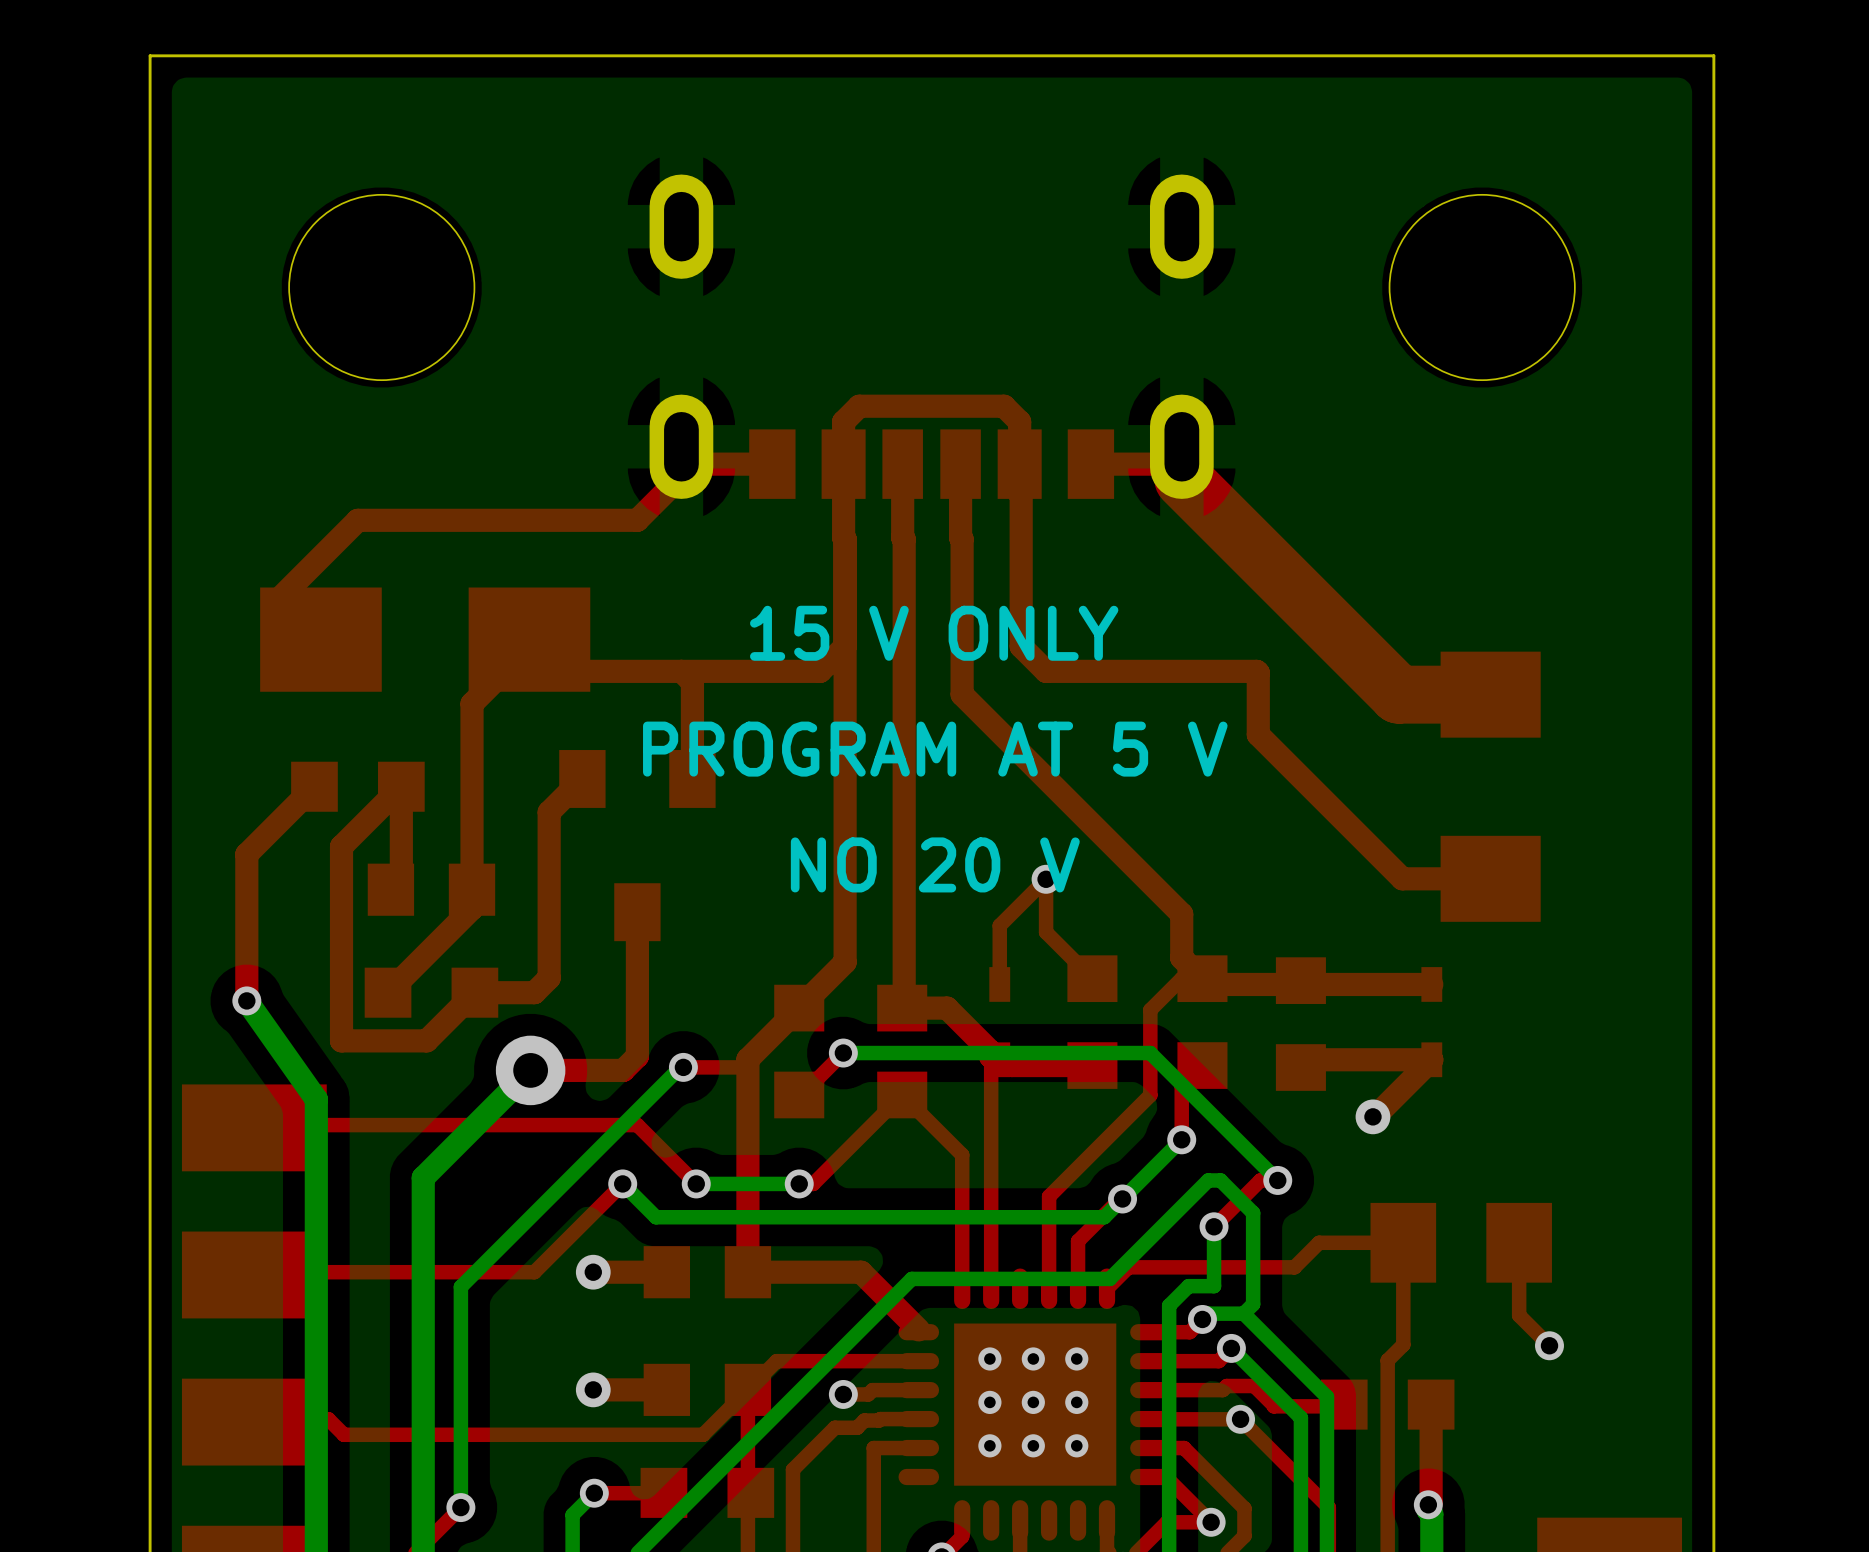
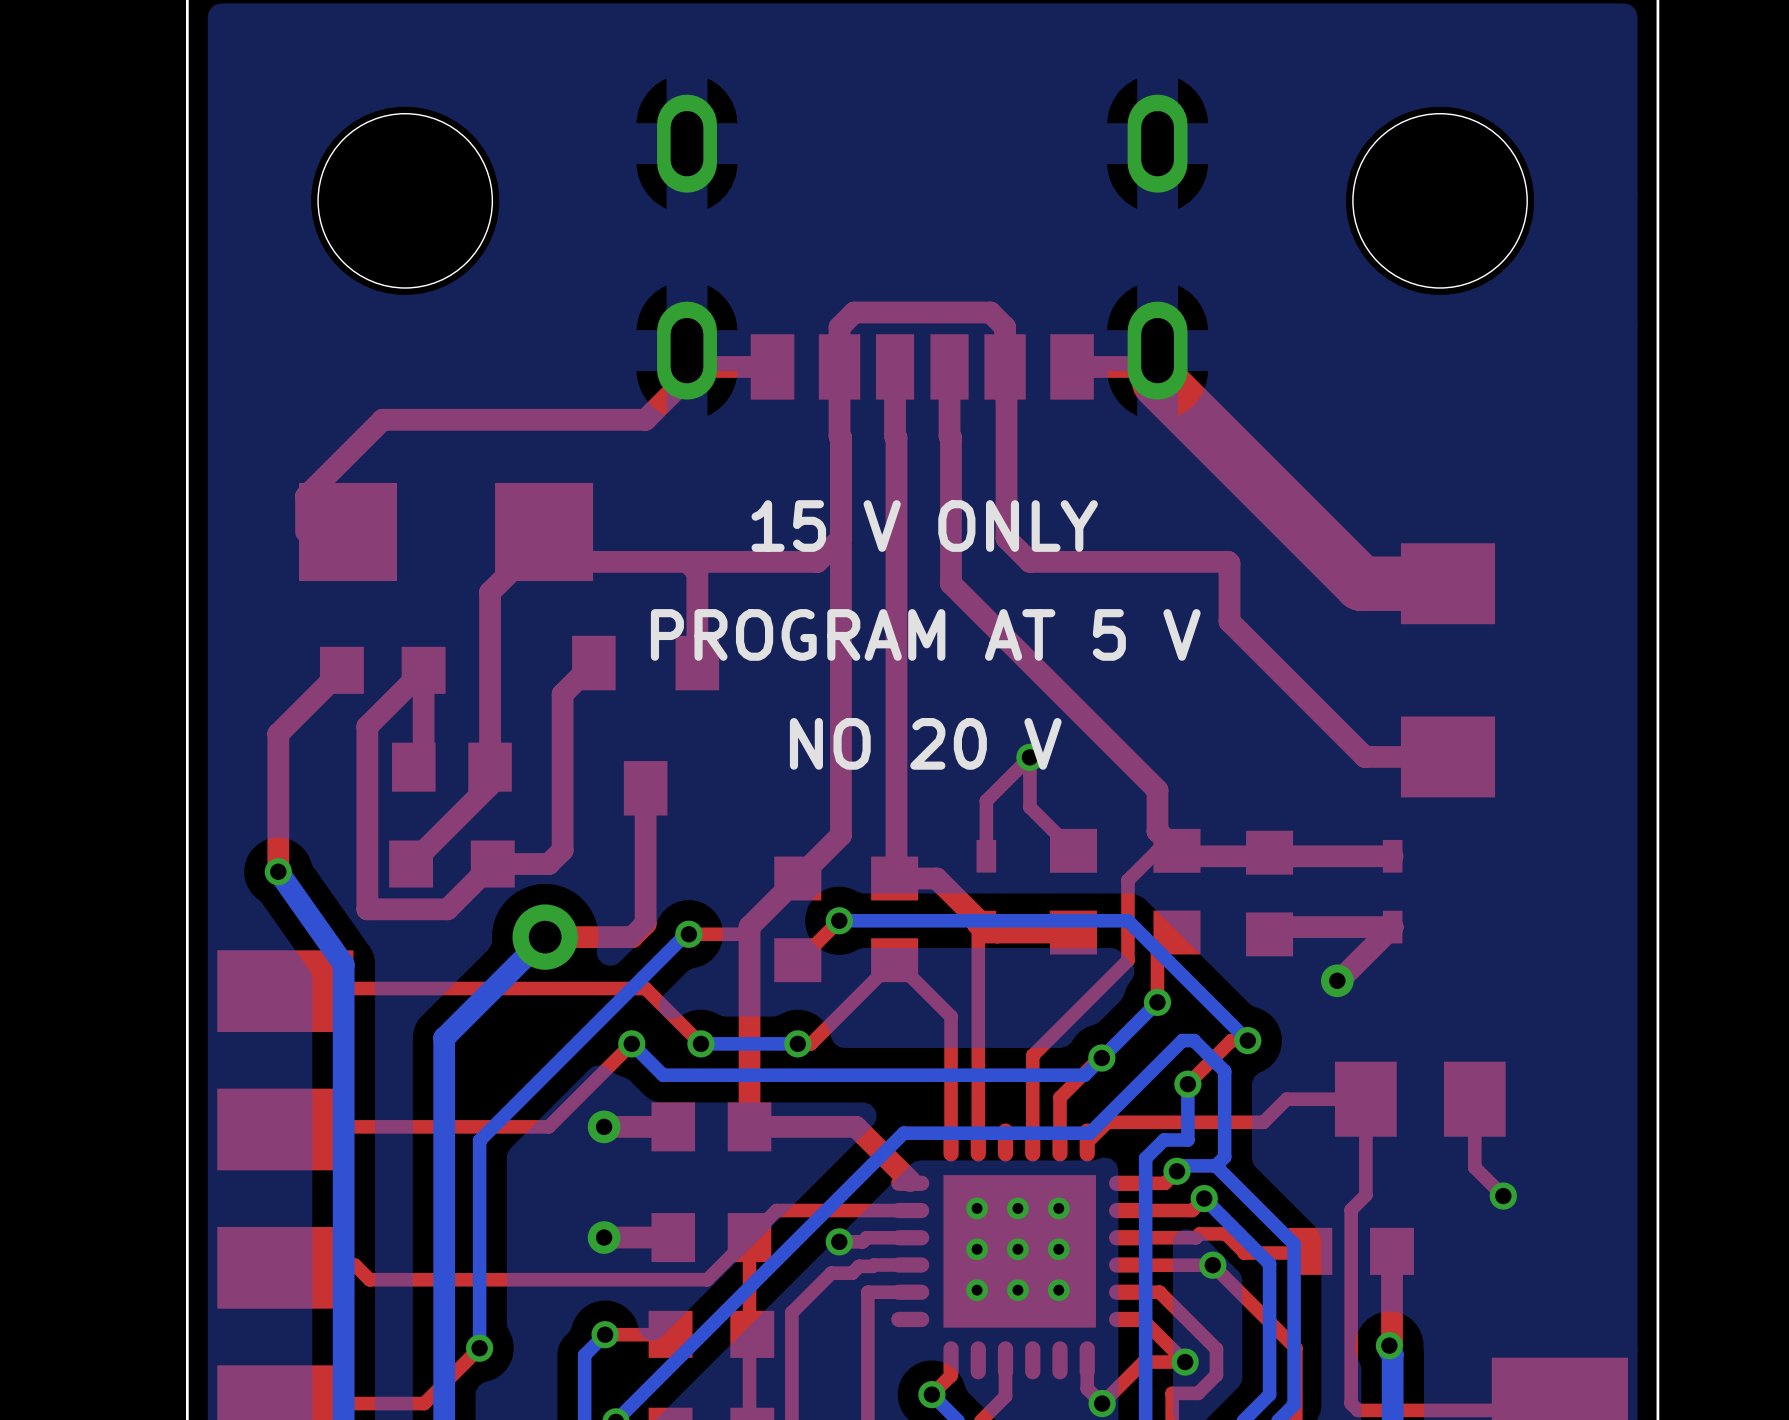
part footprint: [260, 587, 591, 692] -> [299, 482, 594, 582]

